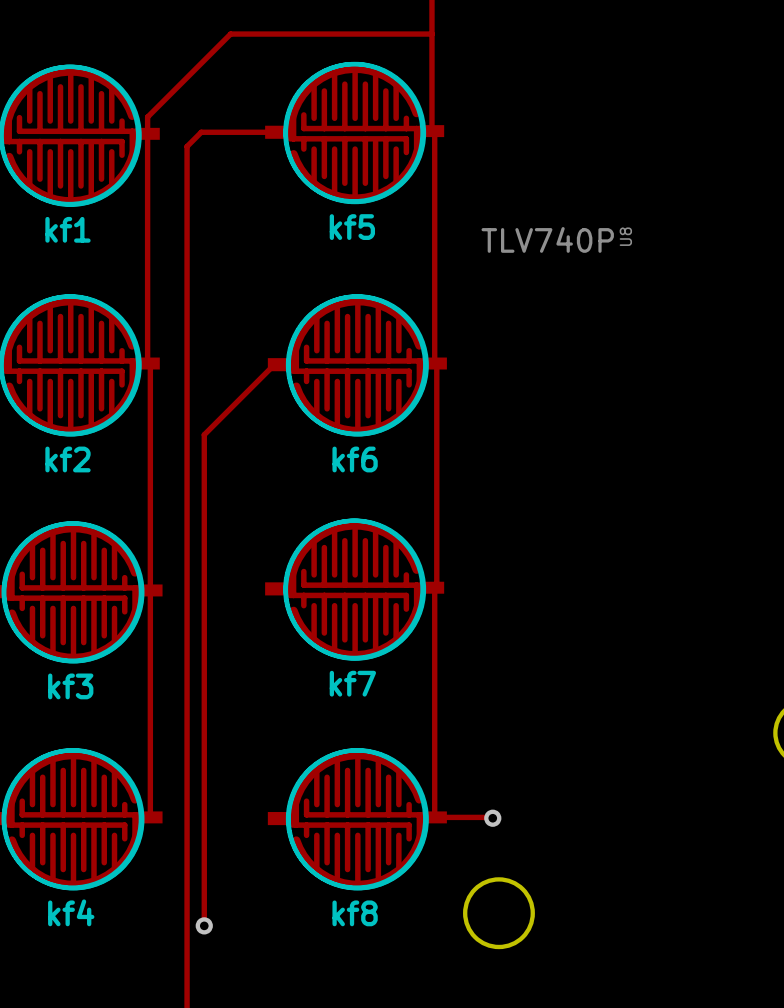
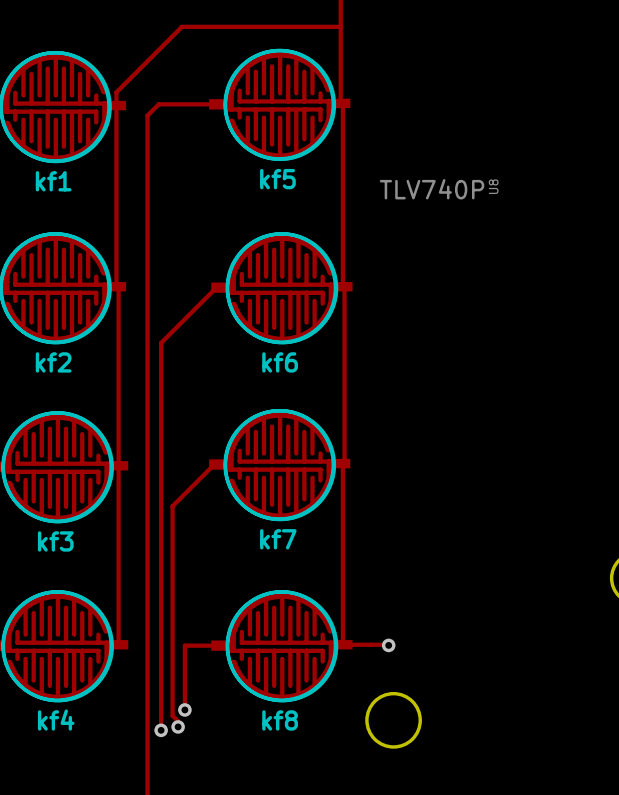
track: none -> (219, 464) (214, 464) (172, 506) (172, 715) (178, 721) (178, 726)
track: none -> (221, 645) (184, 645) (184, 709)
via: none -> (184, 709)
via: none -> (178, 726)

